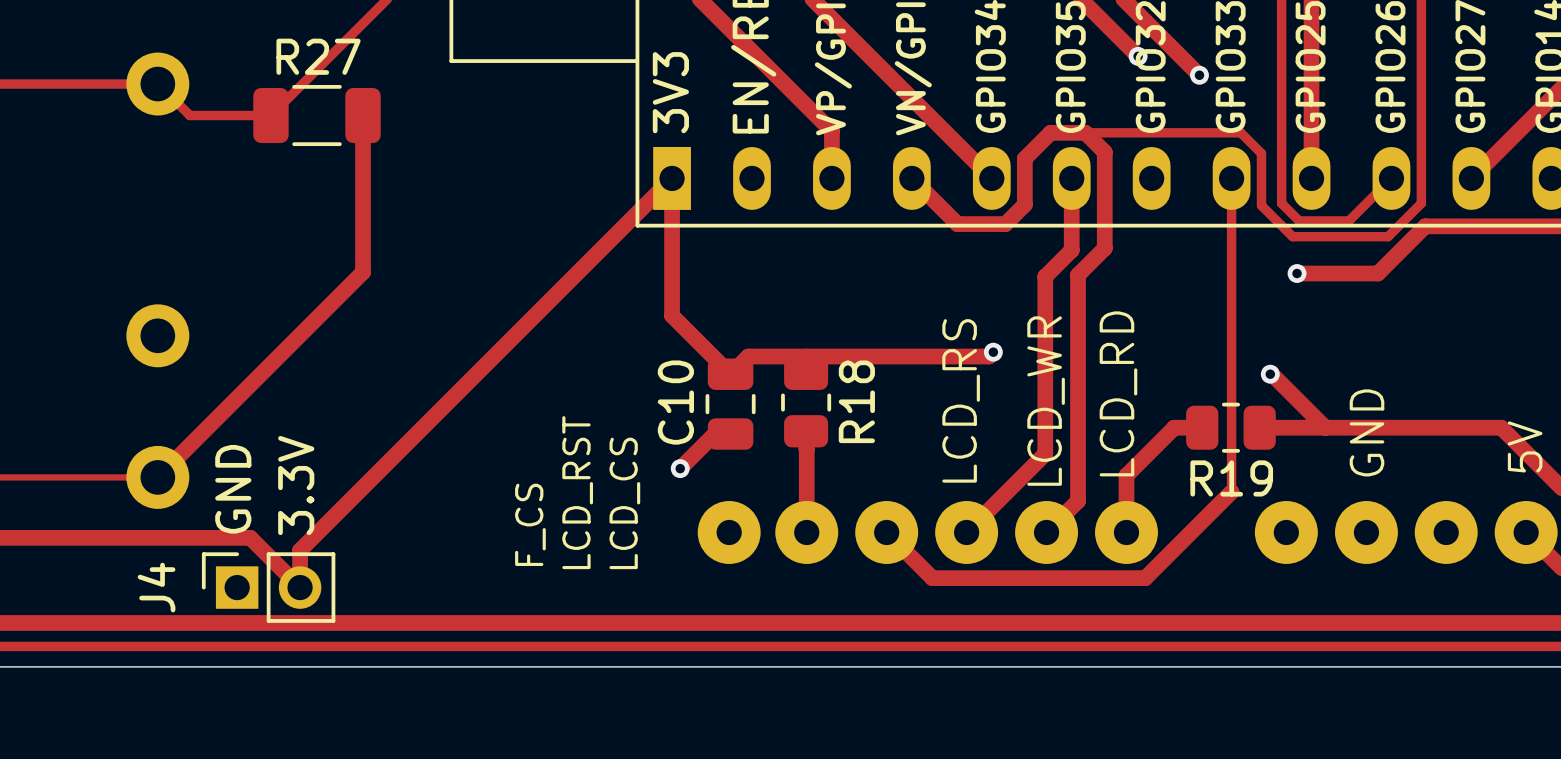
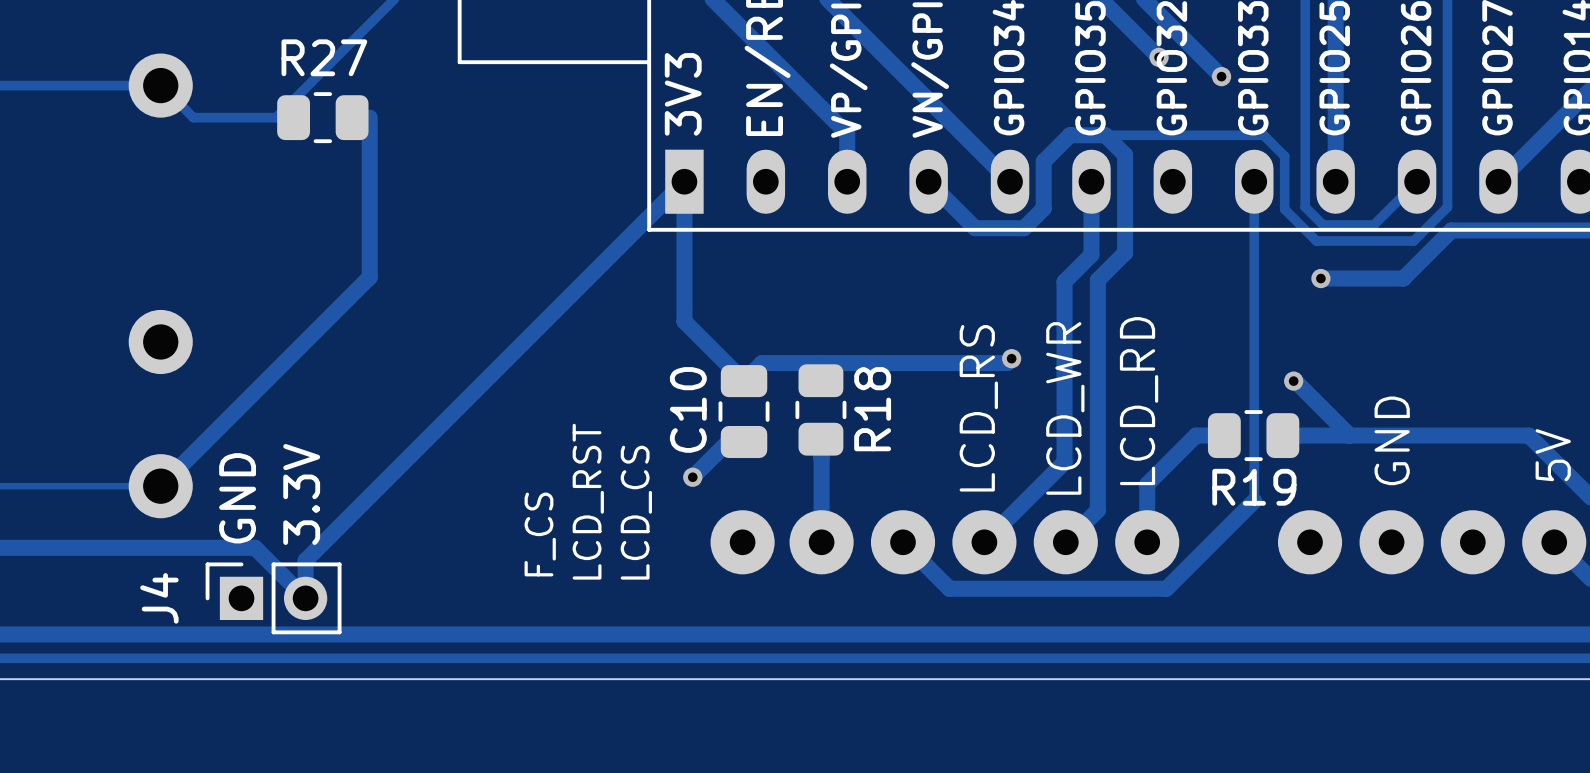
R27 footprint: [253, 84, 381, 147] -> [277, 92, 369, 144]

